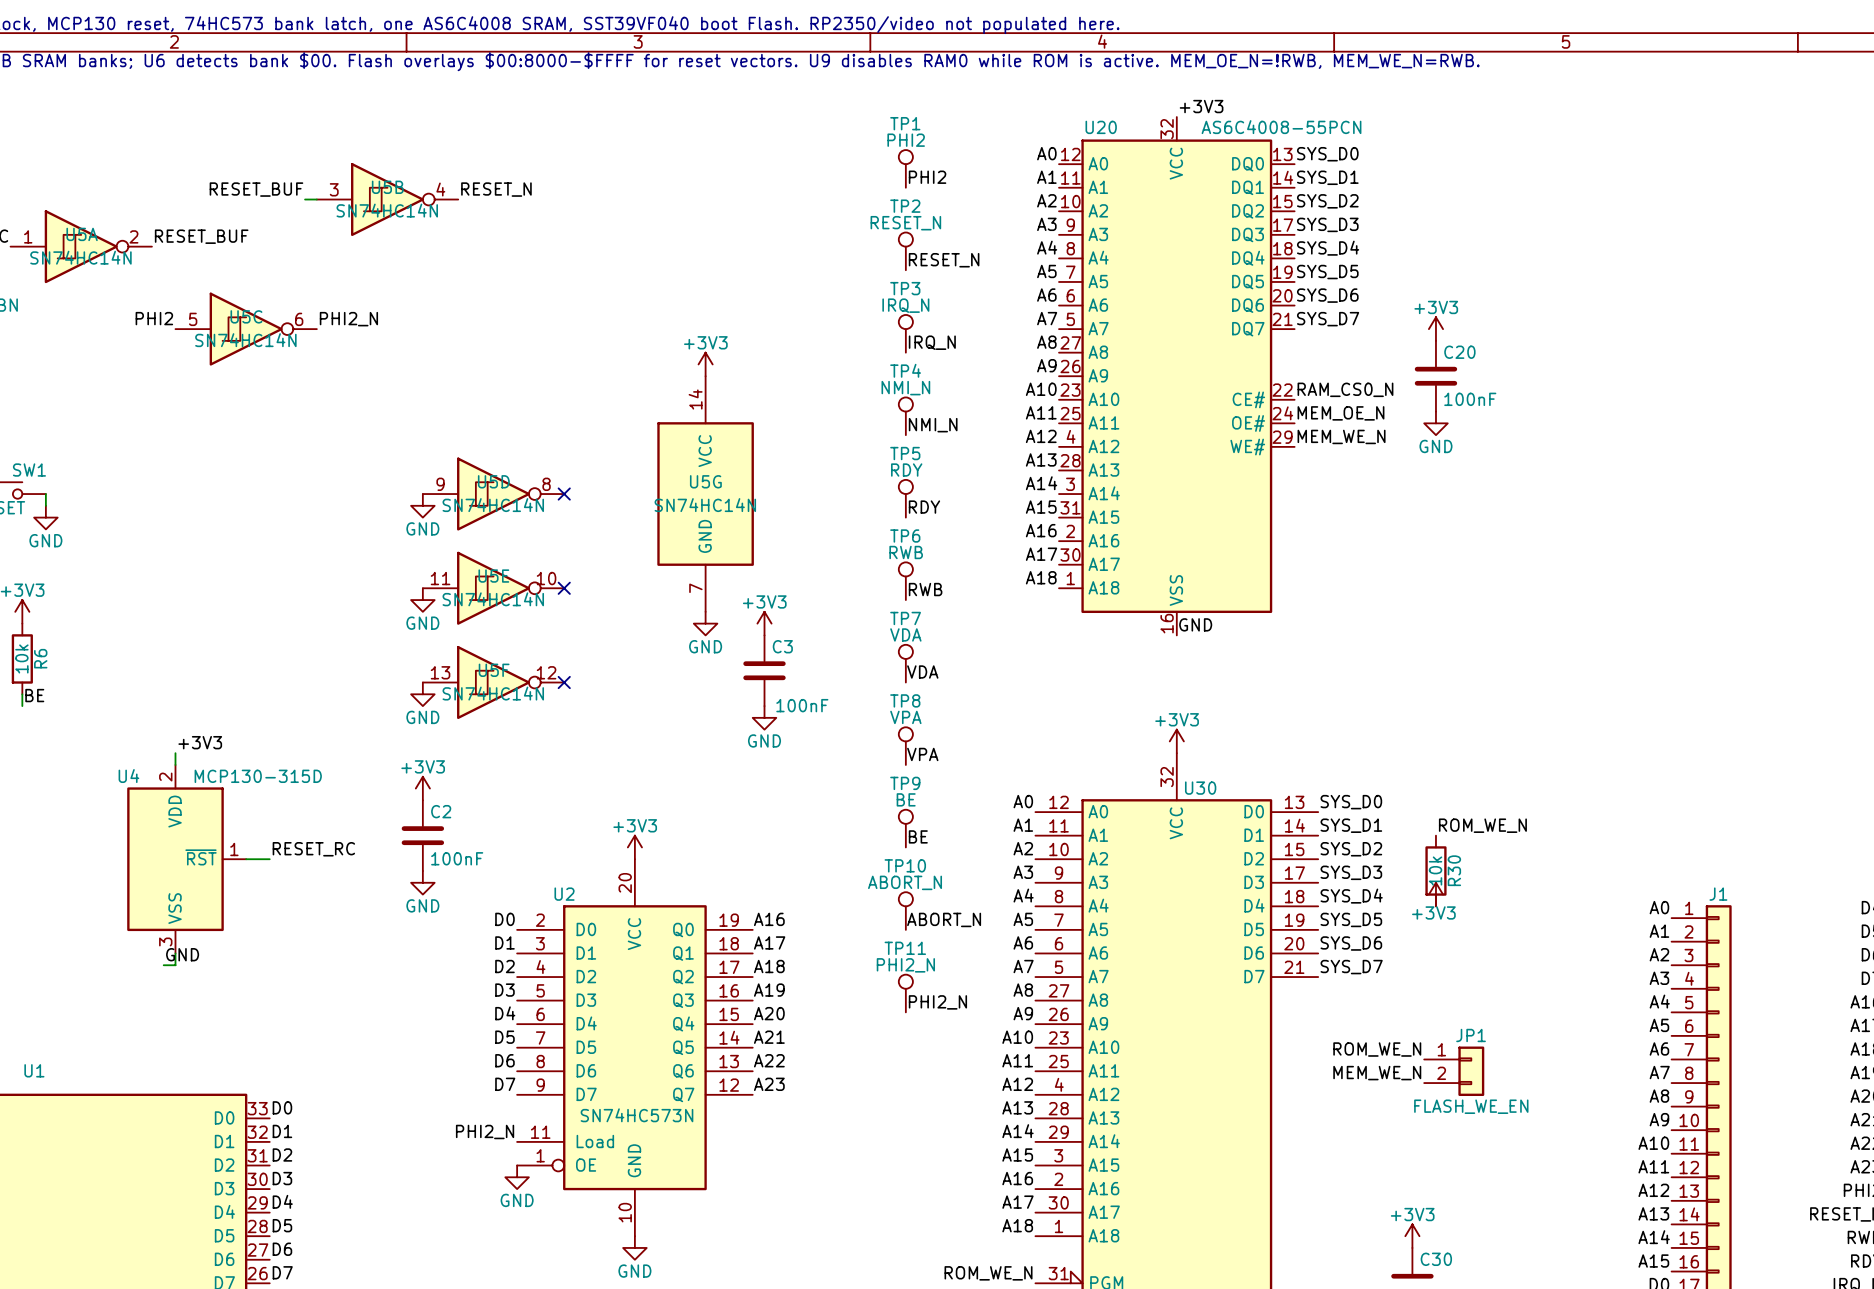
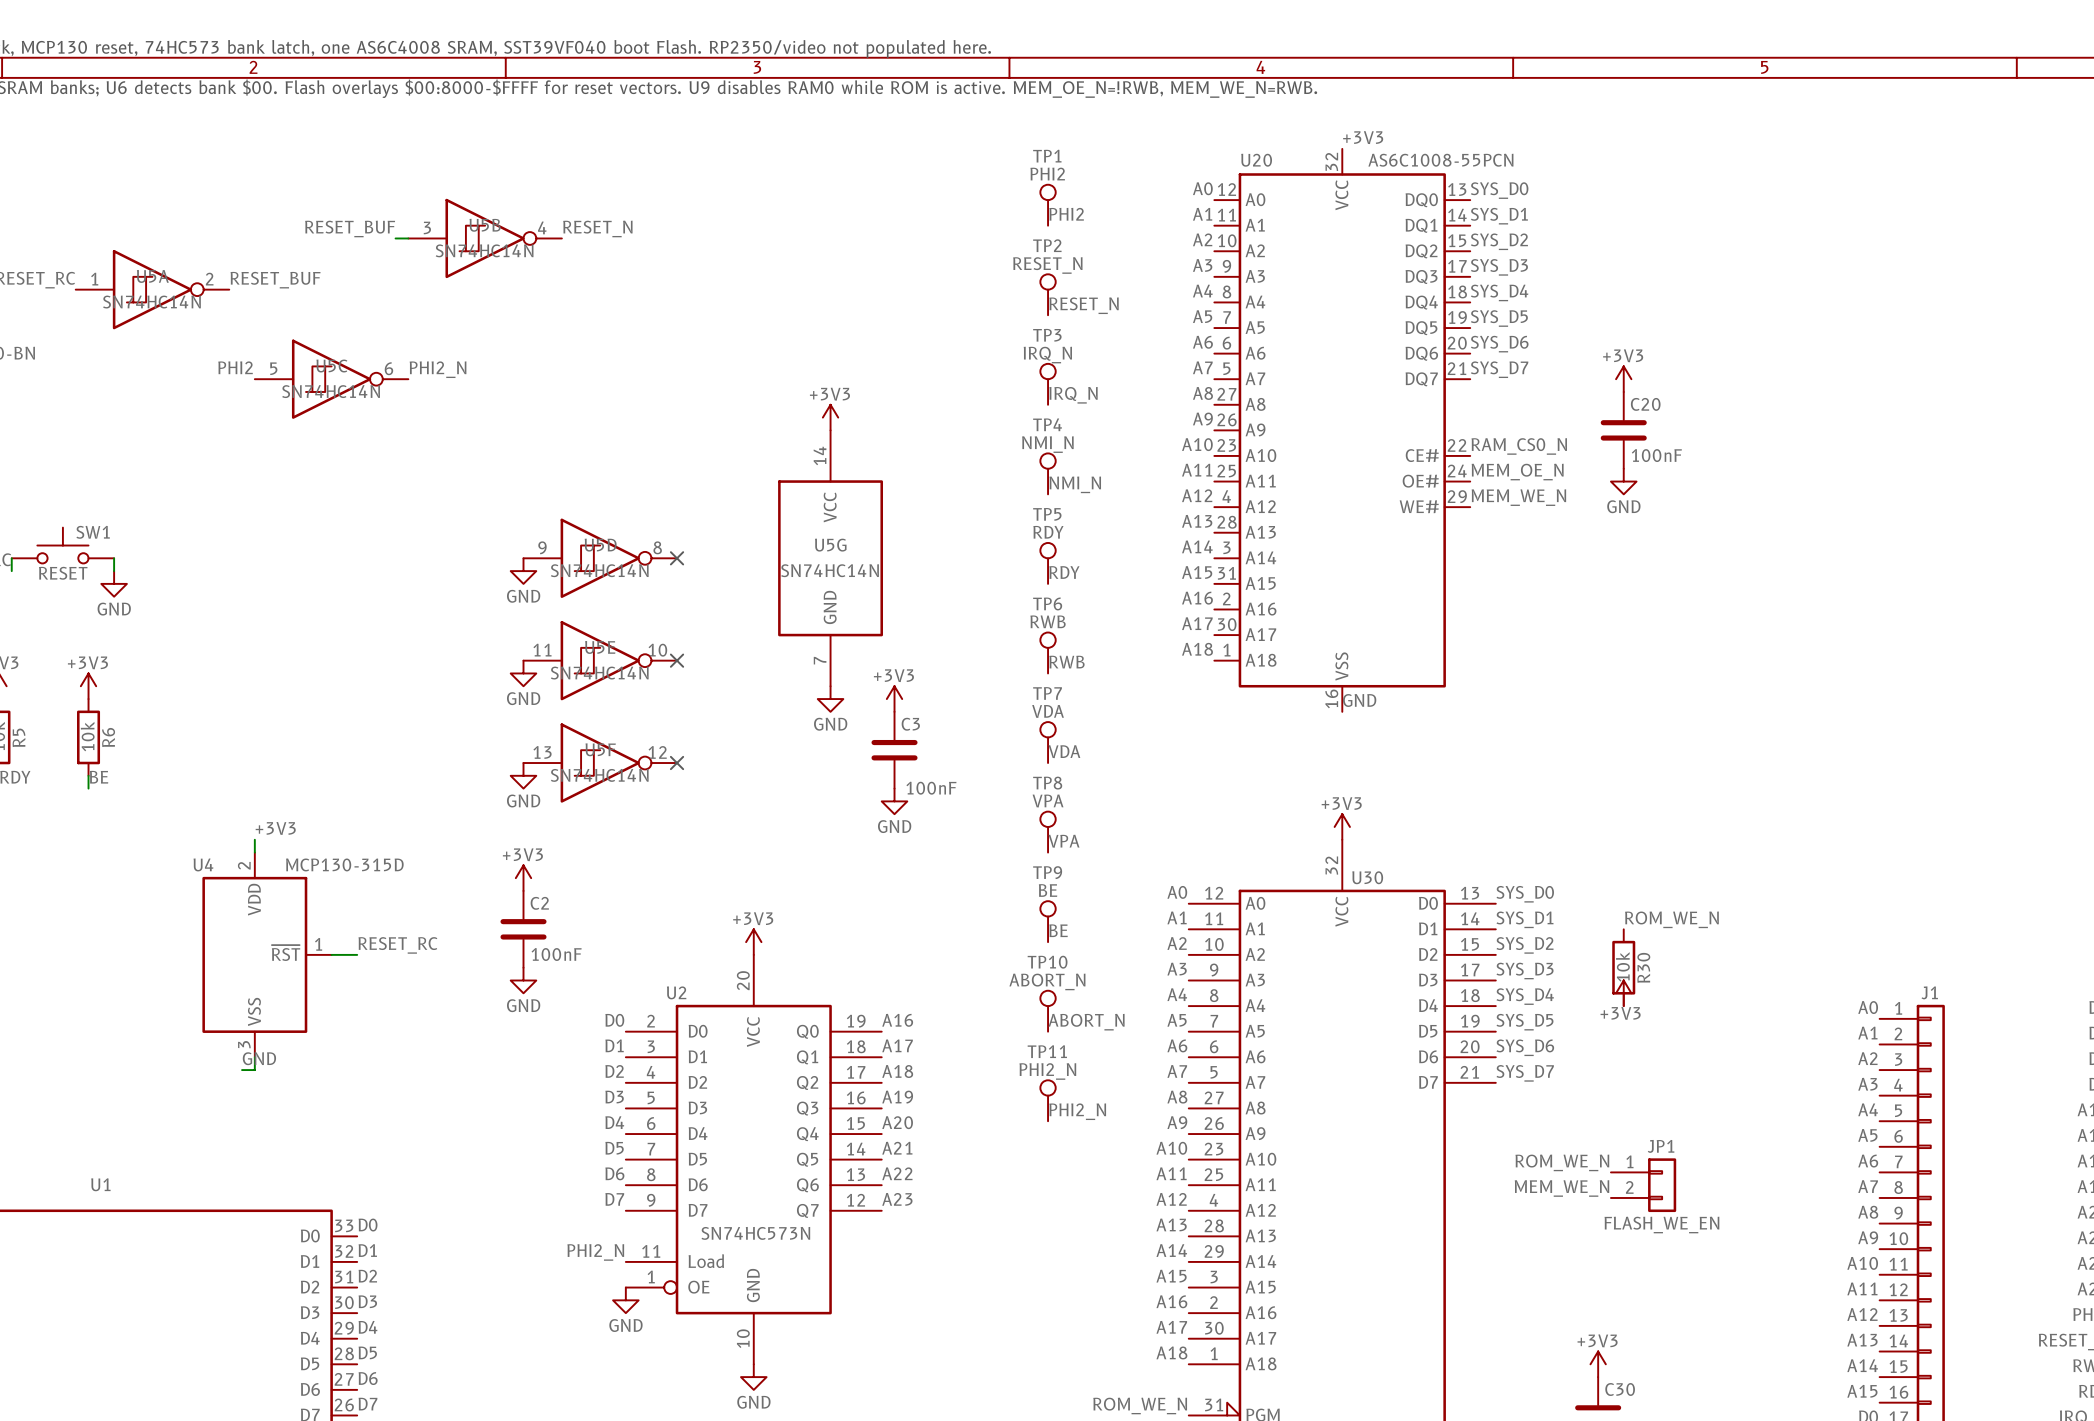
U20 value: AS6C4008-55PCN (1281, 127) -> AS6C1008-55PCN (1440, 160)

